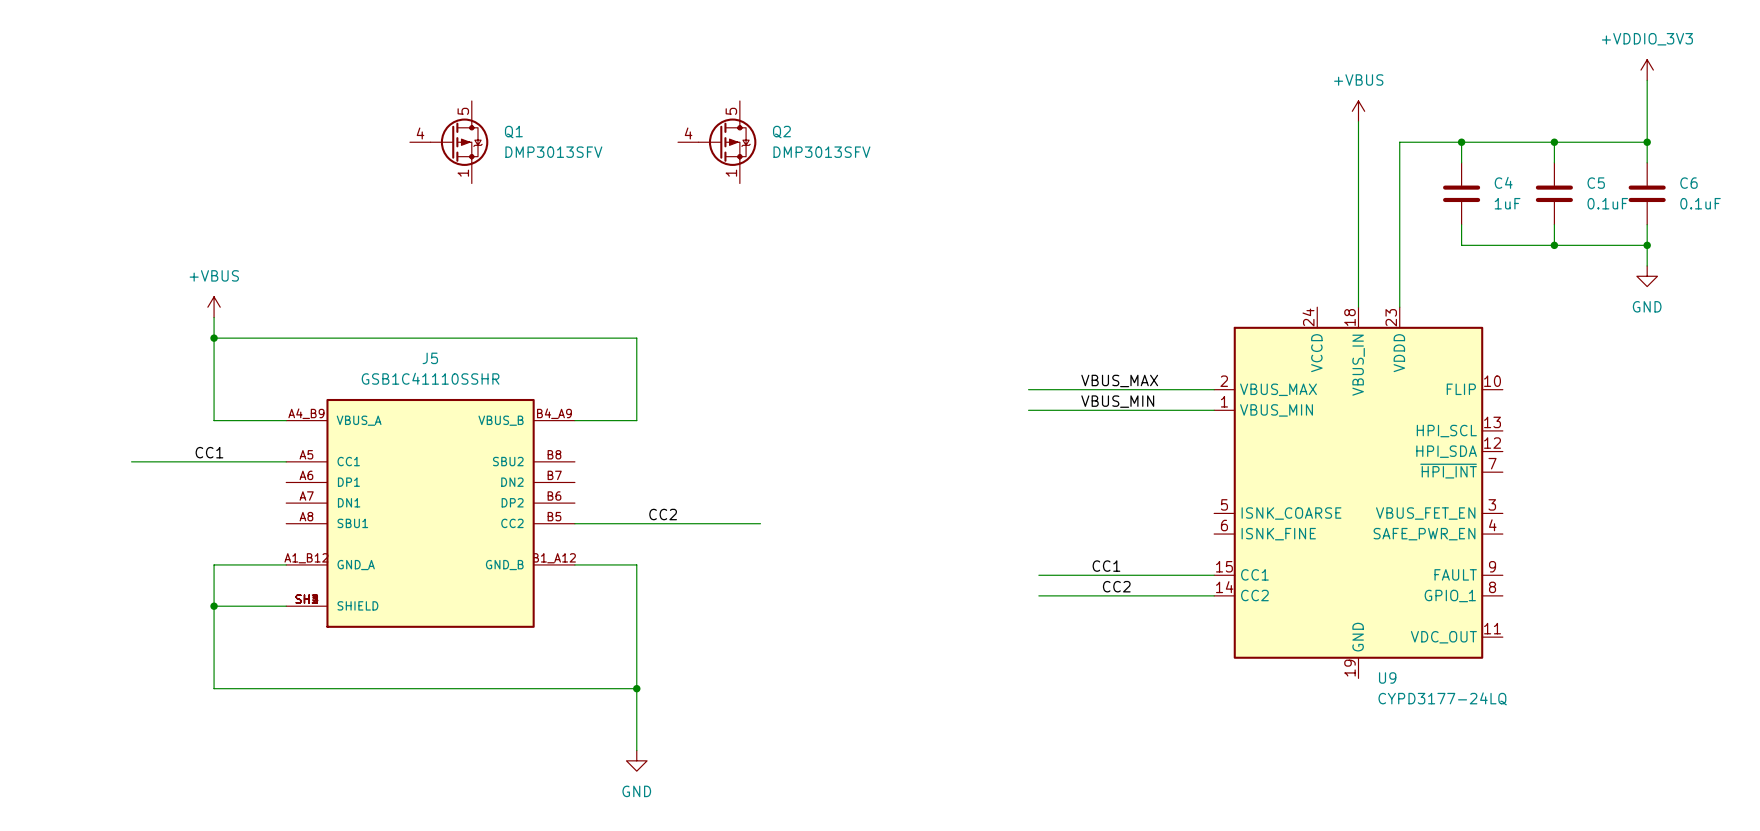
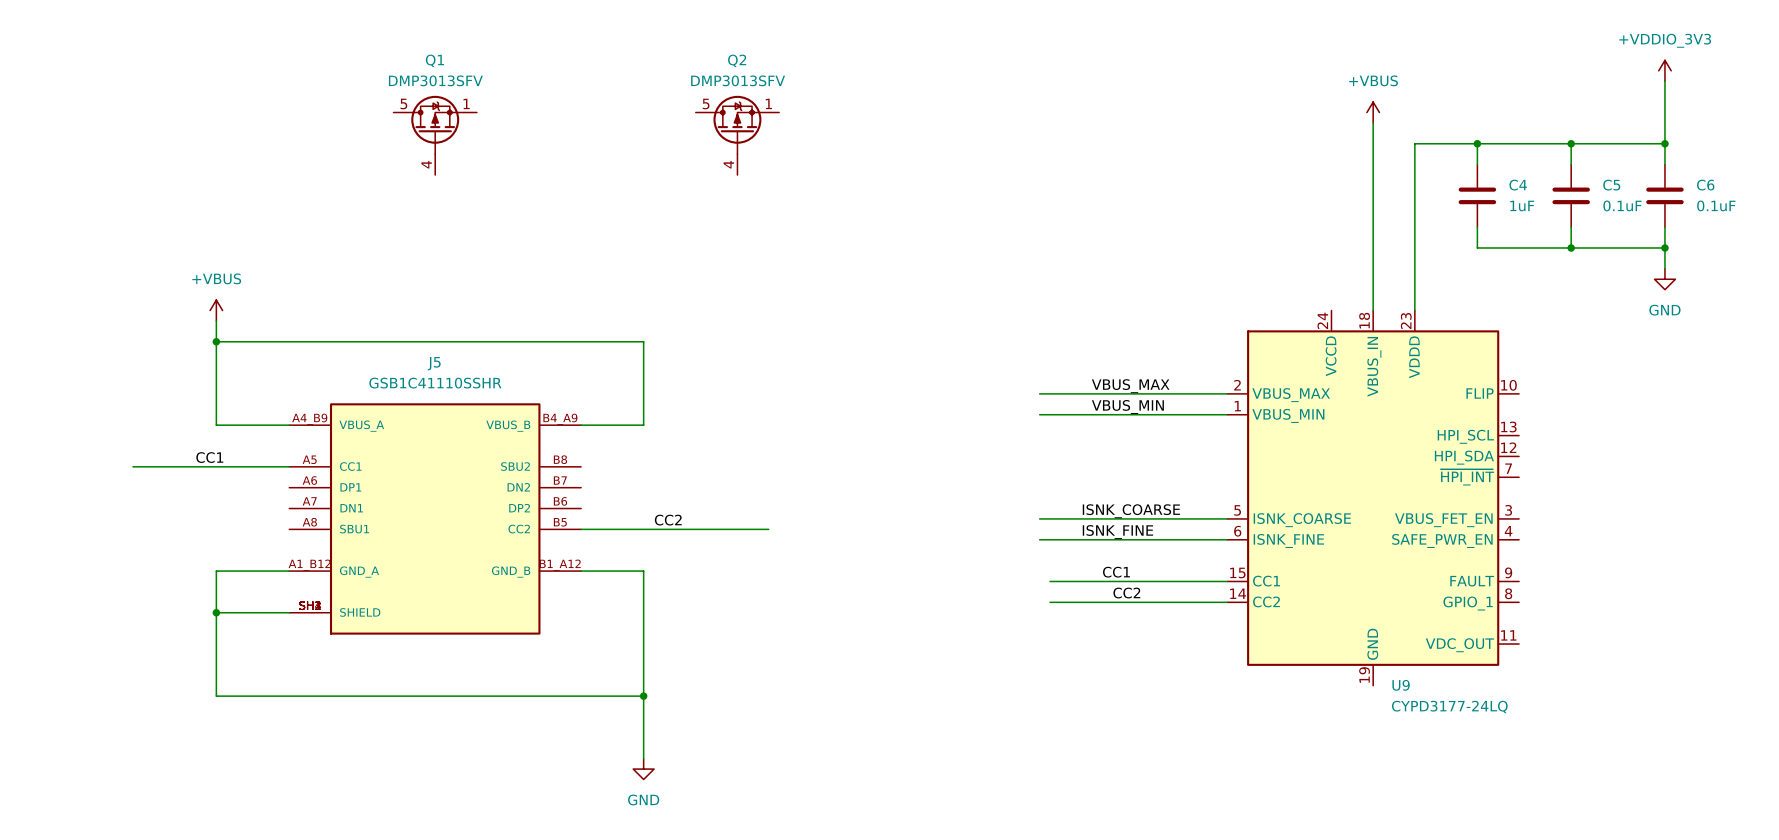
Q1 rotation: 0° (459, 142) -> 90° counterclockwise (435, 125)
Q2 rotation: 0° (727, 142) -> 90° counterclockwise (737, 125)
Q1 value position: DMP3013SFV (553, 152) -> DMP3013SFV (435, 80)
Q2 value position: DMP3013SFV (821, 152) -> DMP3013SFV (738, 80)
label: none -> ISNK_COARSE (1131, 511)
wire: none -> (1039, 518) (1227, 518)
label: none -> ISNK_FINE (1117, 532)
wire: none -> (1039, 539) (1227, 539)

